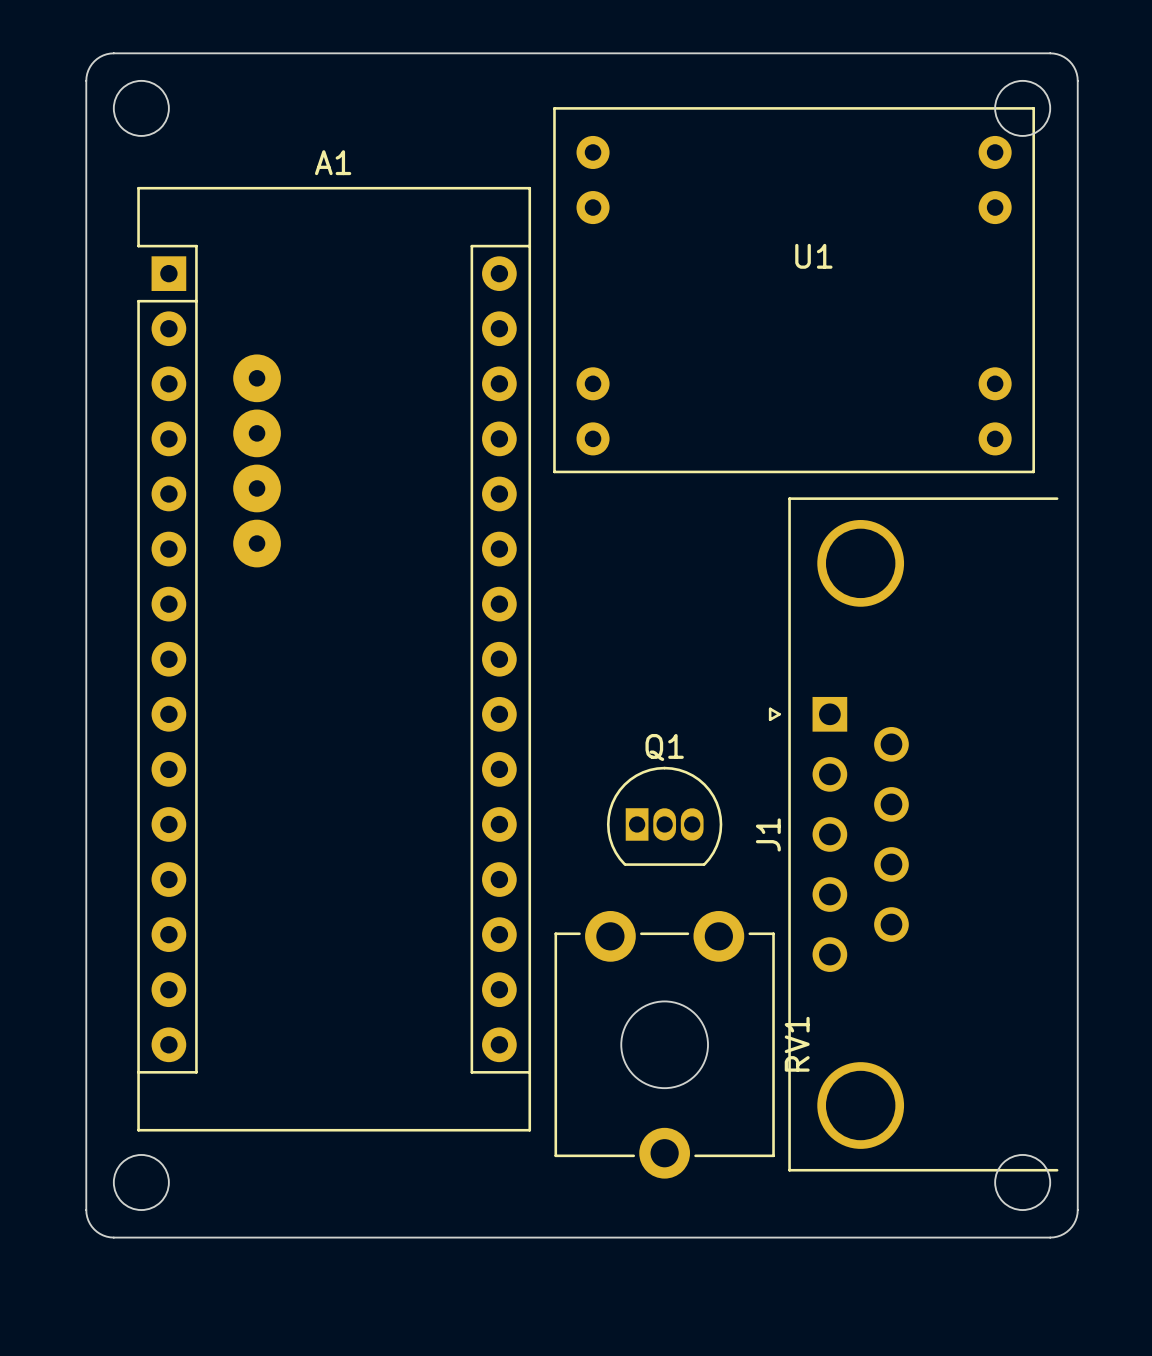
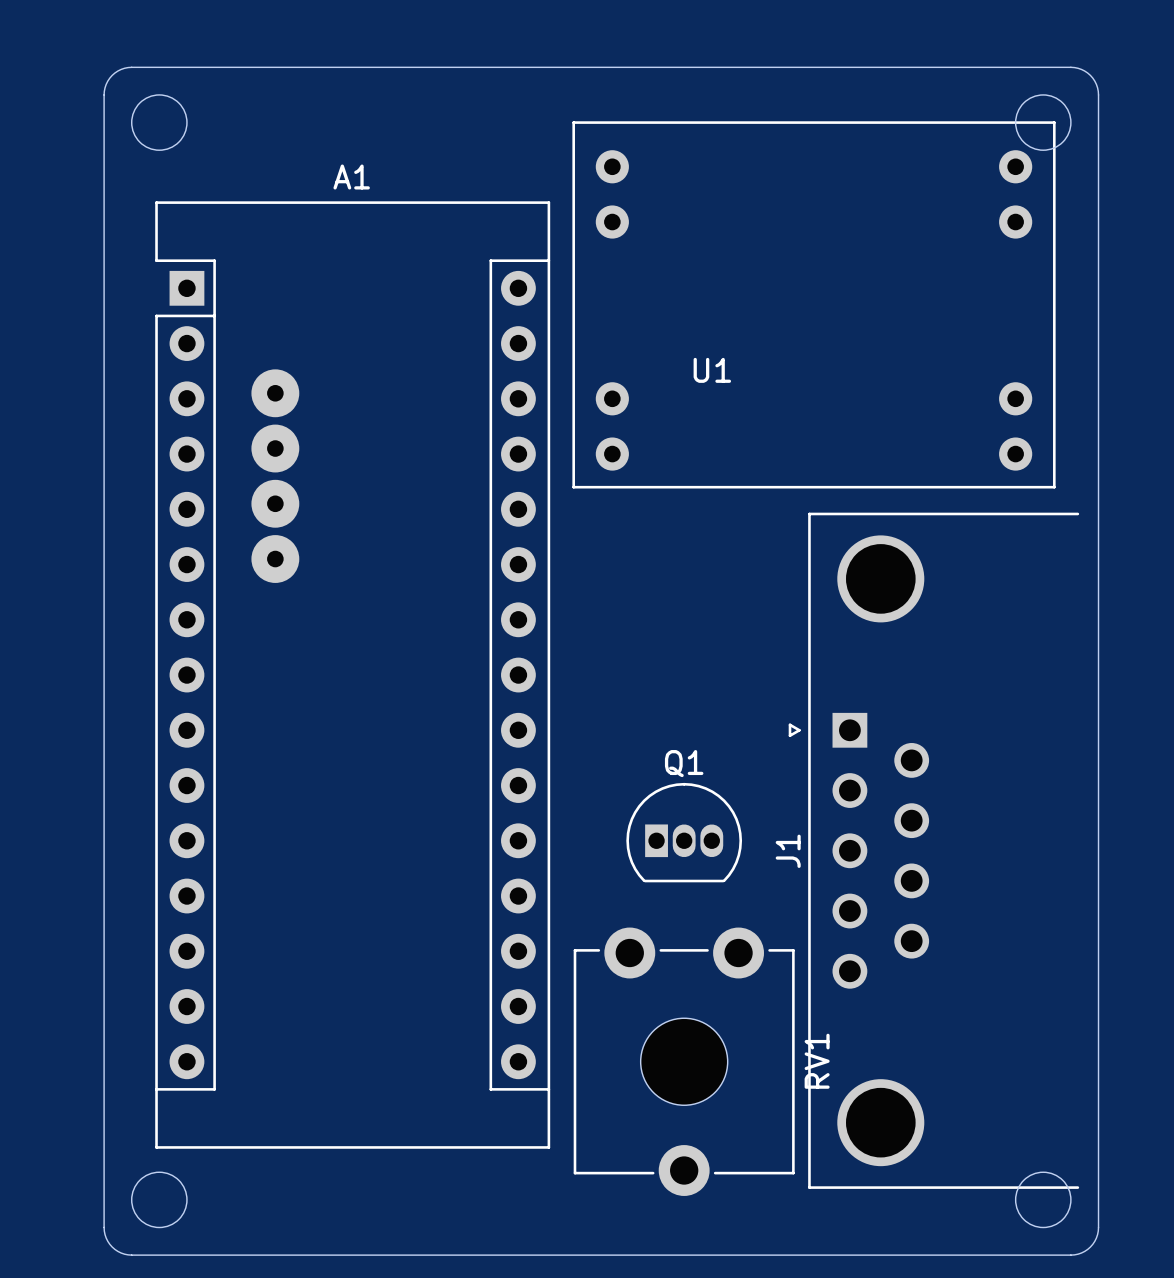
U1 name position: U1 (813, 256) -> U1 (712, 370)

